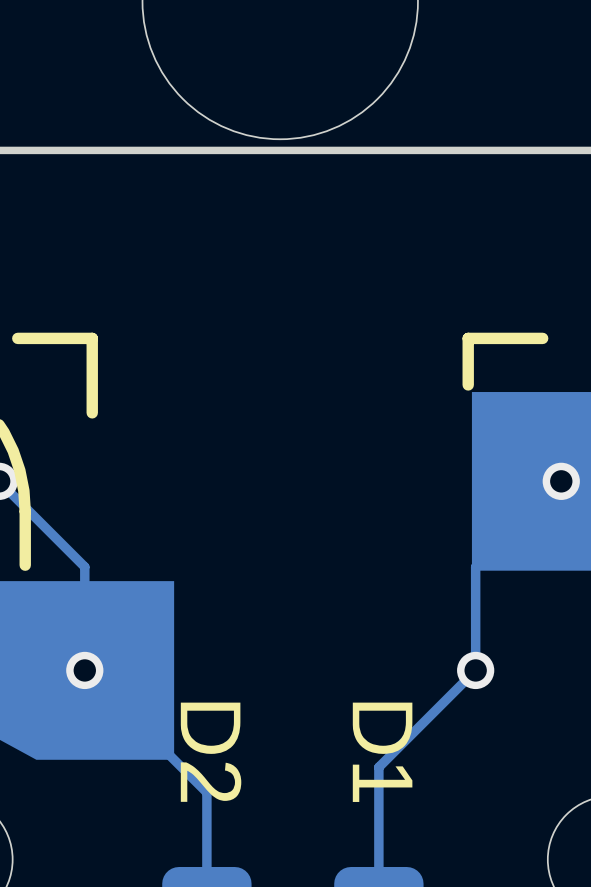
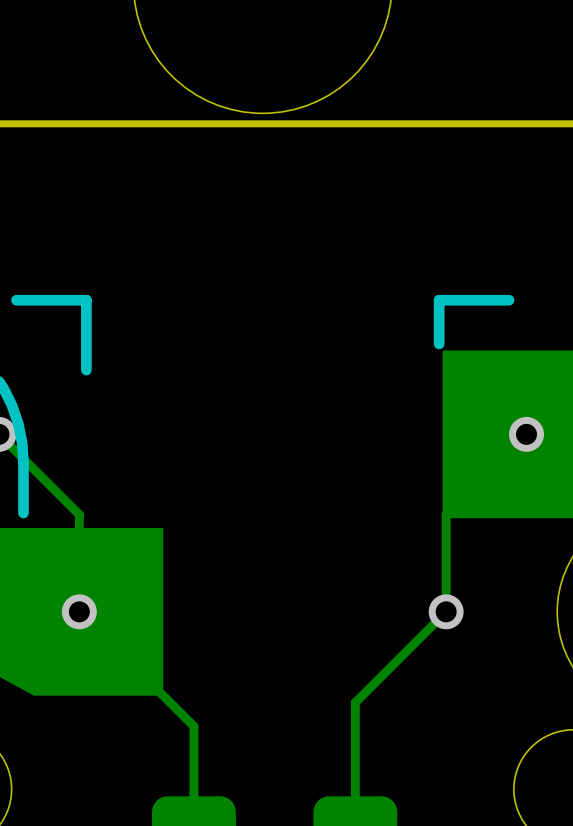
D2 name: D2 (211, 752) -> none
D1 name: D1 (382, 752) -> none

